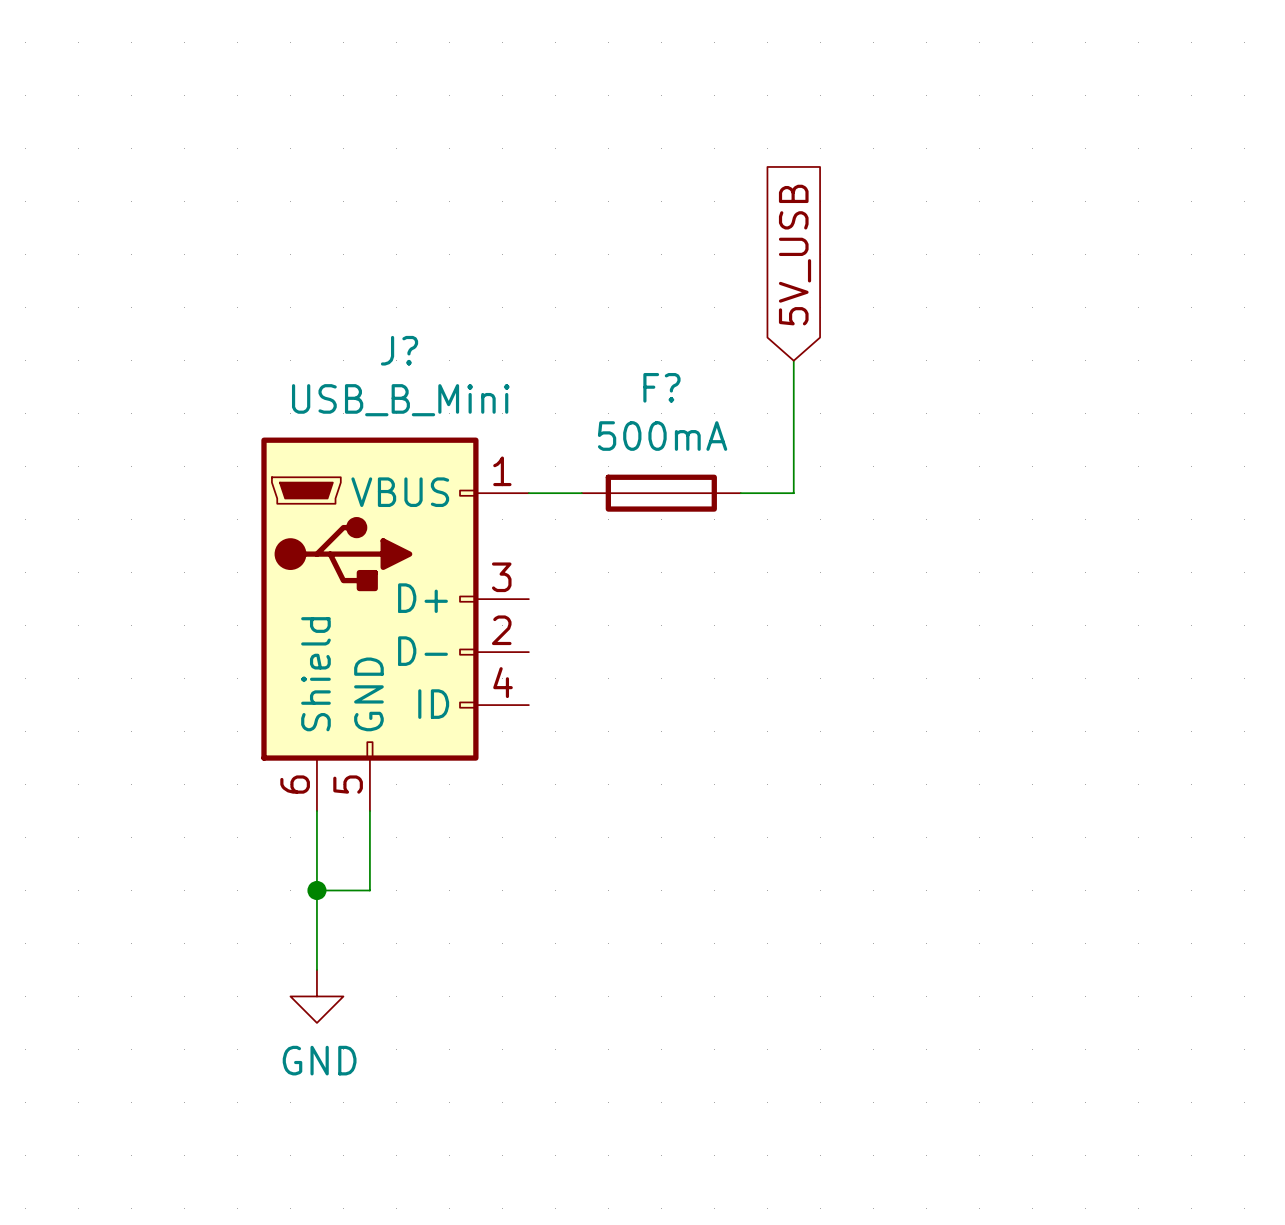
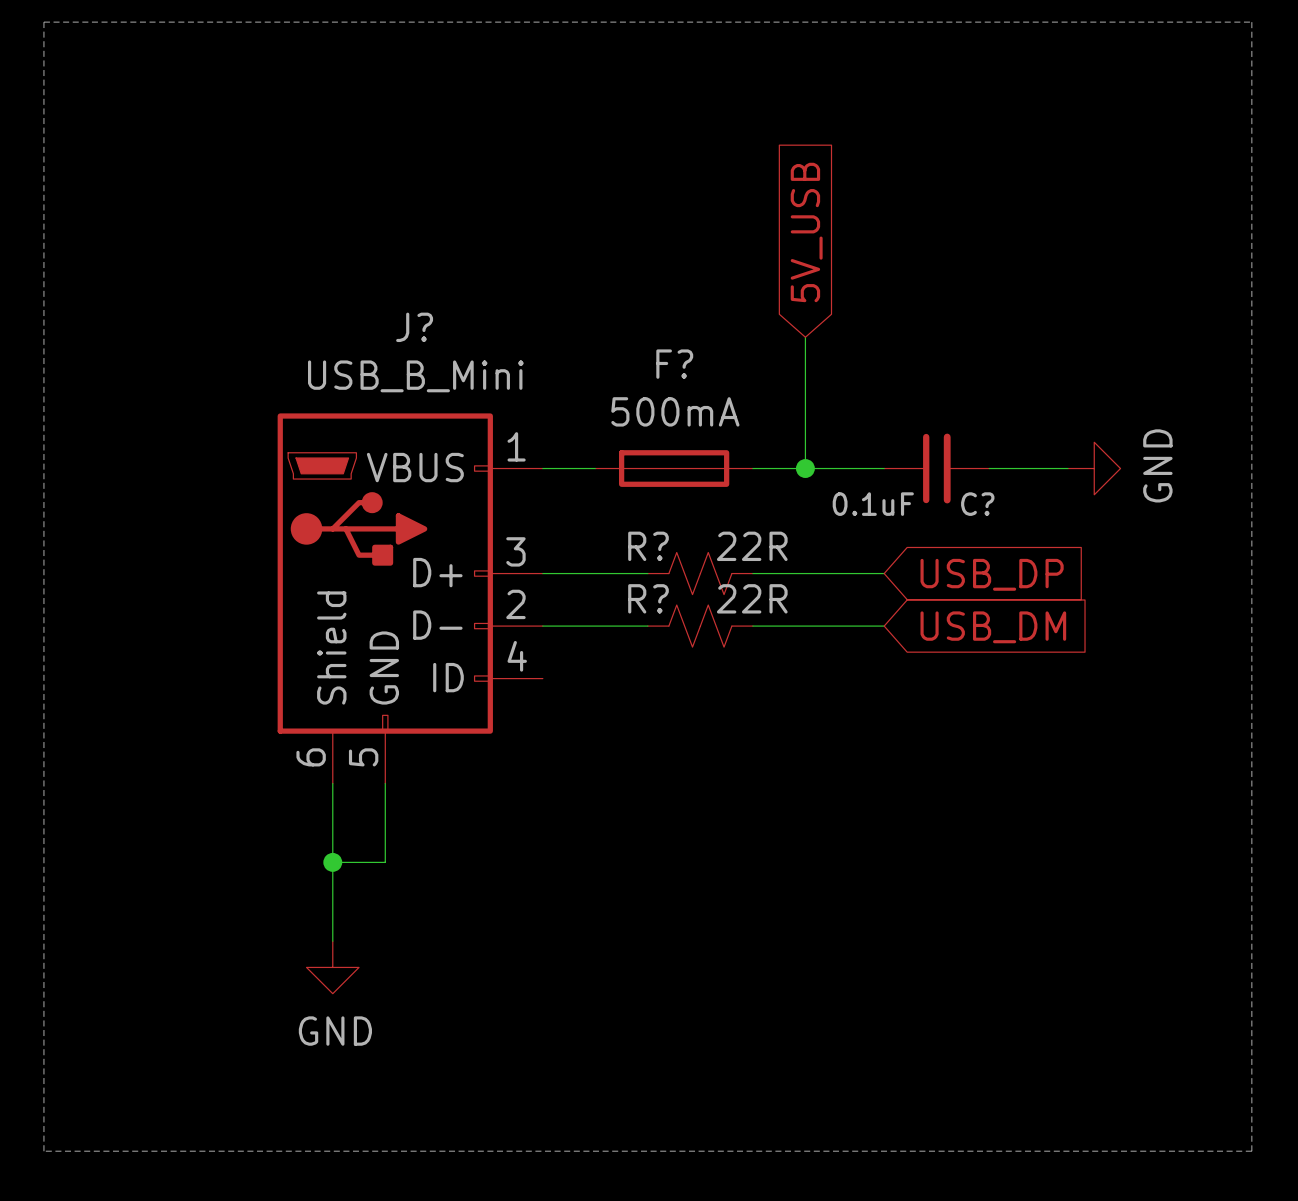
line: none -> (43, 22) (1251, 22) (1251, 1151) (43, 1151) (43, 22)
wire: none -> (805, 468) (884, 468)
junction: none -> (805, 468)
C?: none -> 0.1uF (936, 468)
wire: none -> (989, 468) (1068, 468)
power symbol: none -> GND (1094, 468)
wire: none -> (542, 573) (647, 573)
R?: none -> 22R (700, 573)
wire: none -> (752, 573) (884, 573)
global label: none -> USB_DP (992, 574)
wire: none -> (542, 626) (647, 626)
R?: none -> 22R (700, 626)
wire: none -> (752, 626) (884, 626)
global label: none -> USB_DM (993, 627)

